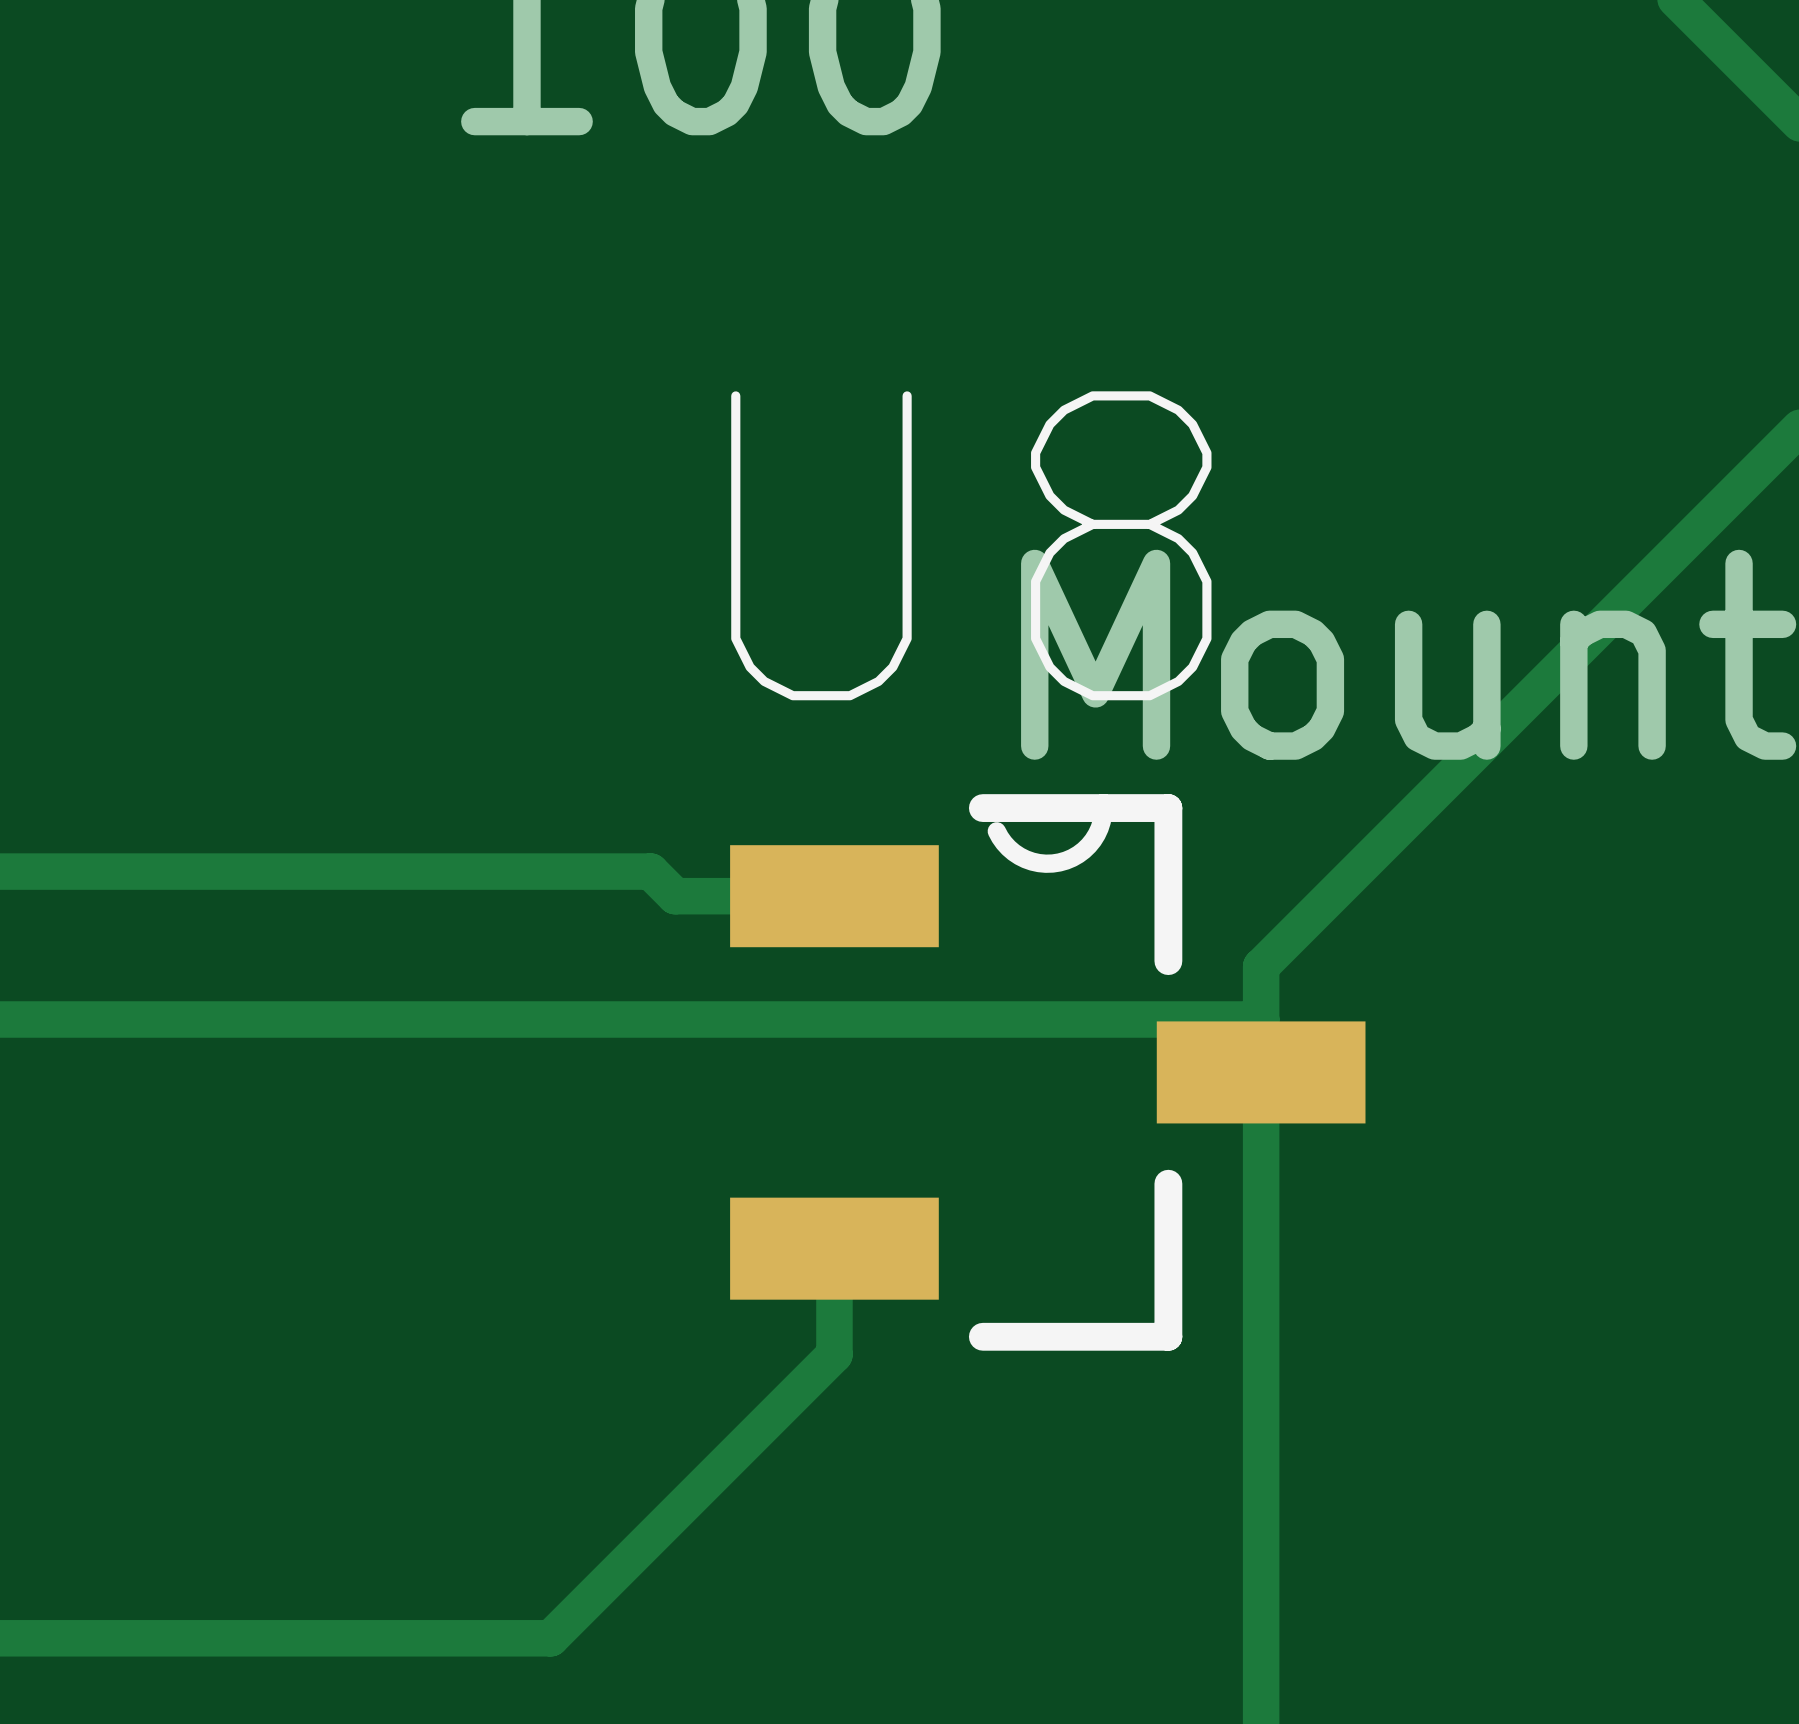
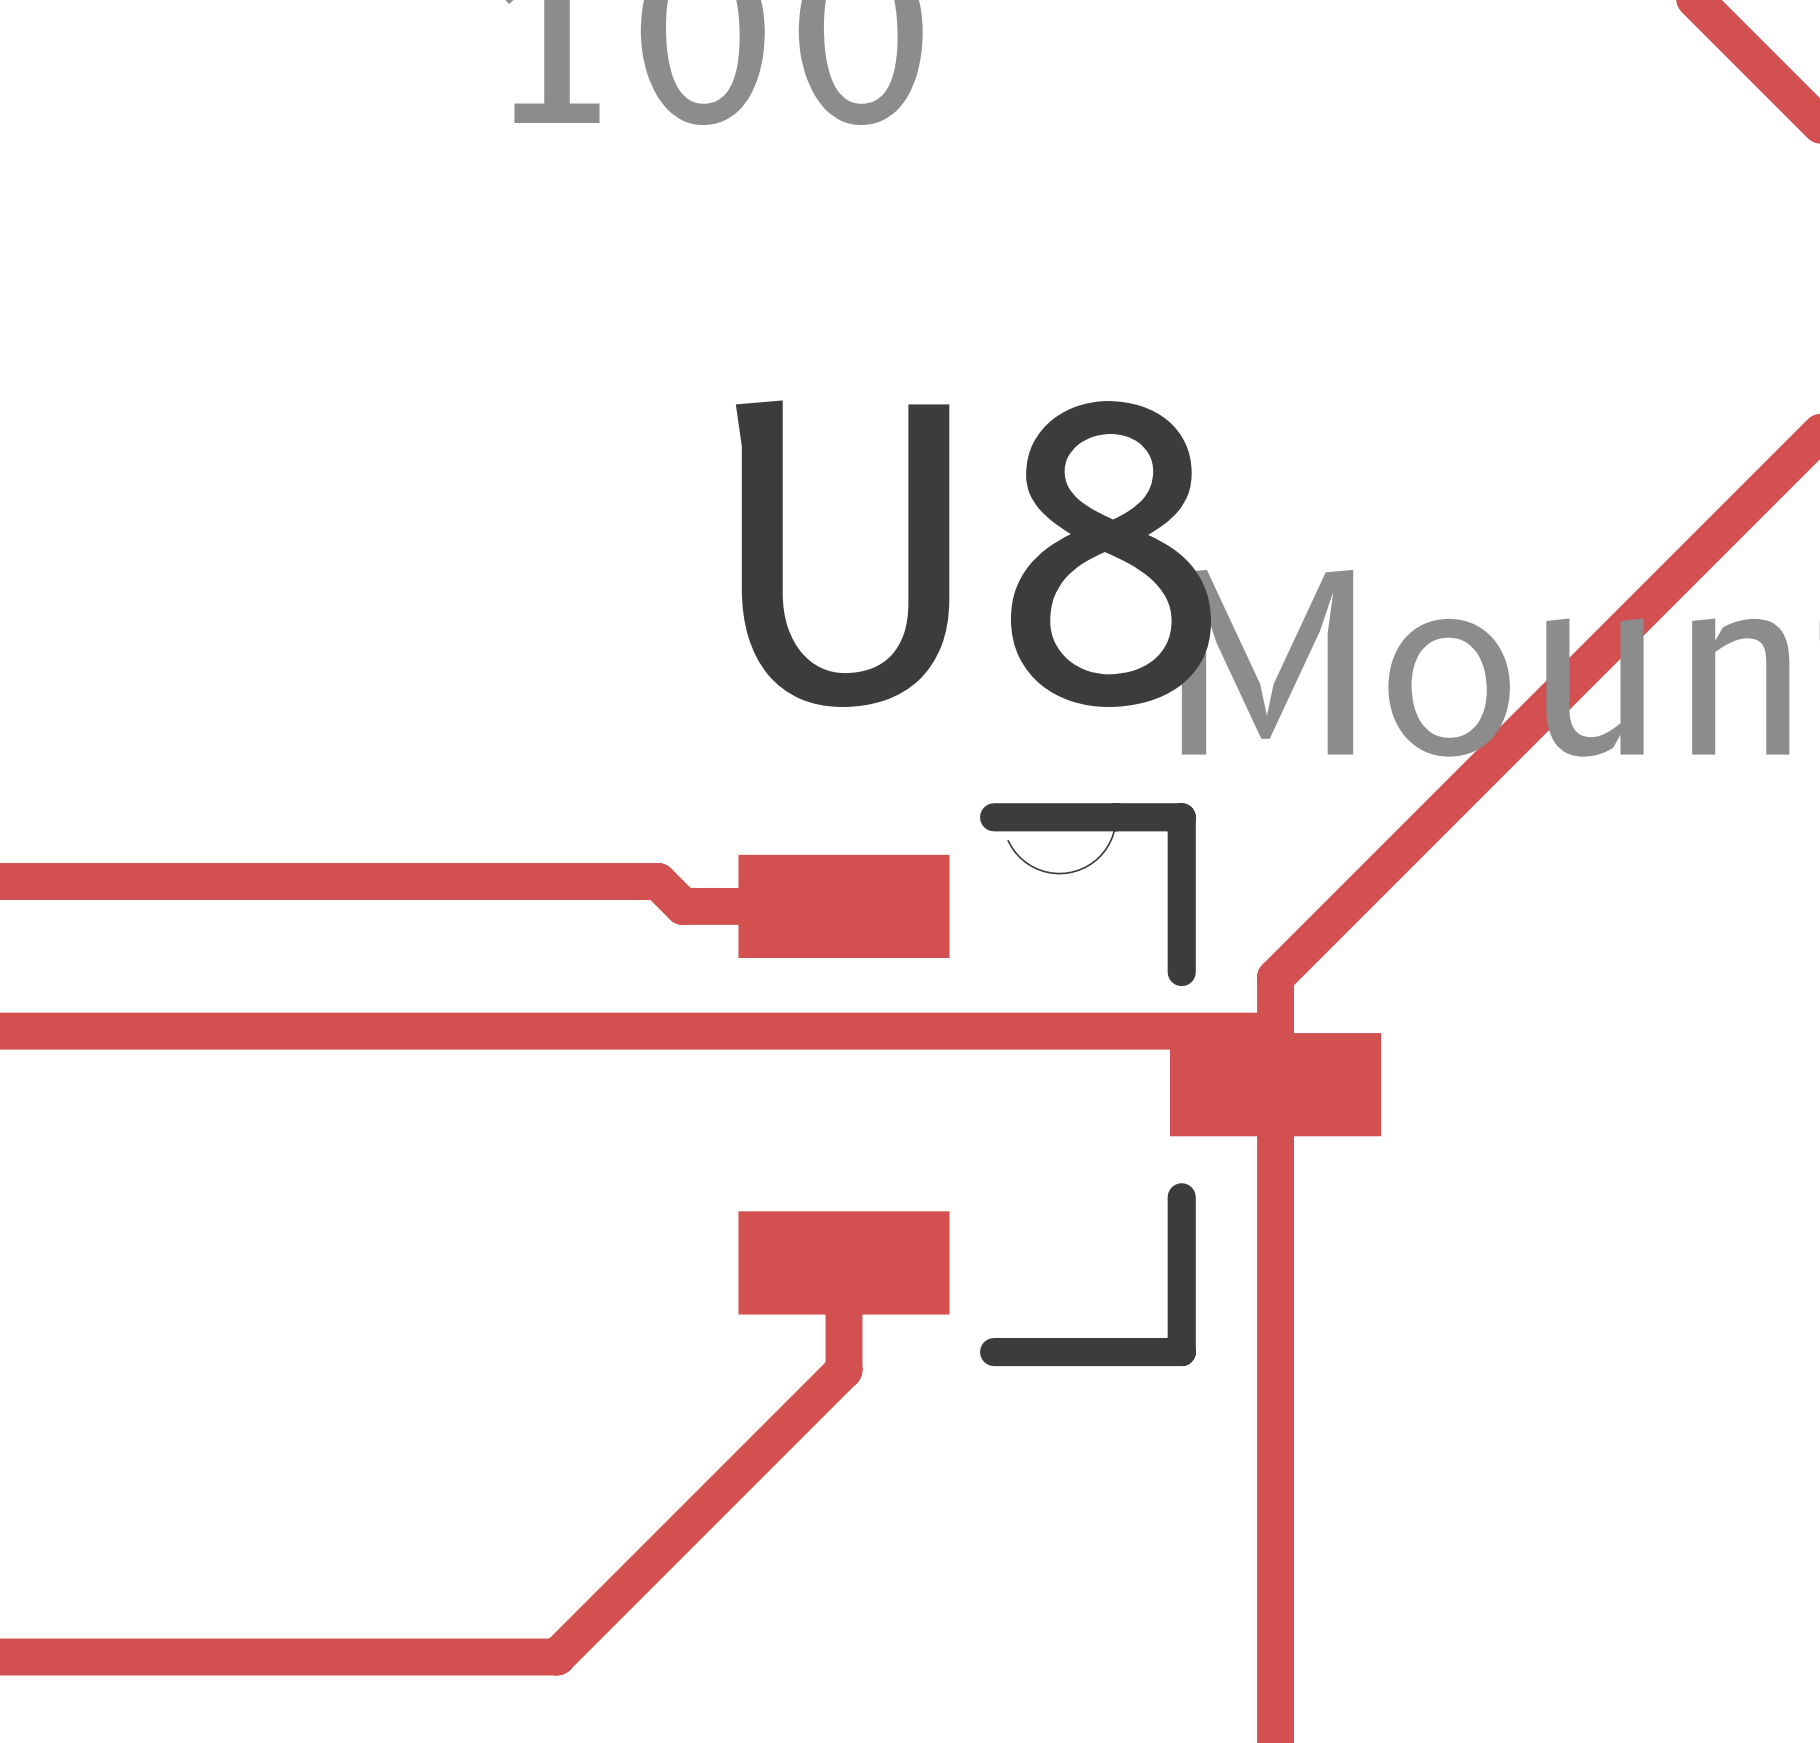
U8 footprint: [730, 794, 1366, 1351] -> [738, 803, 1382, 1367]

